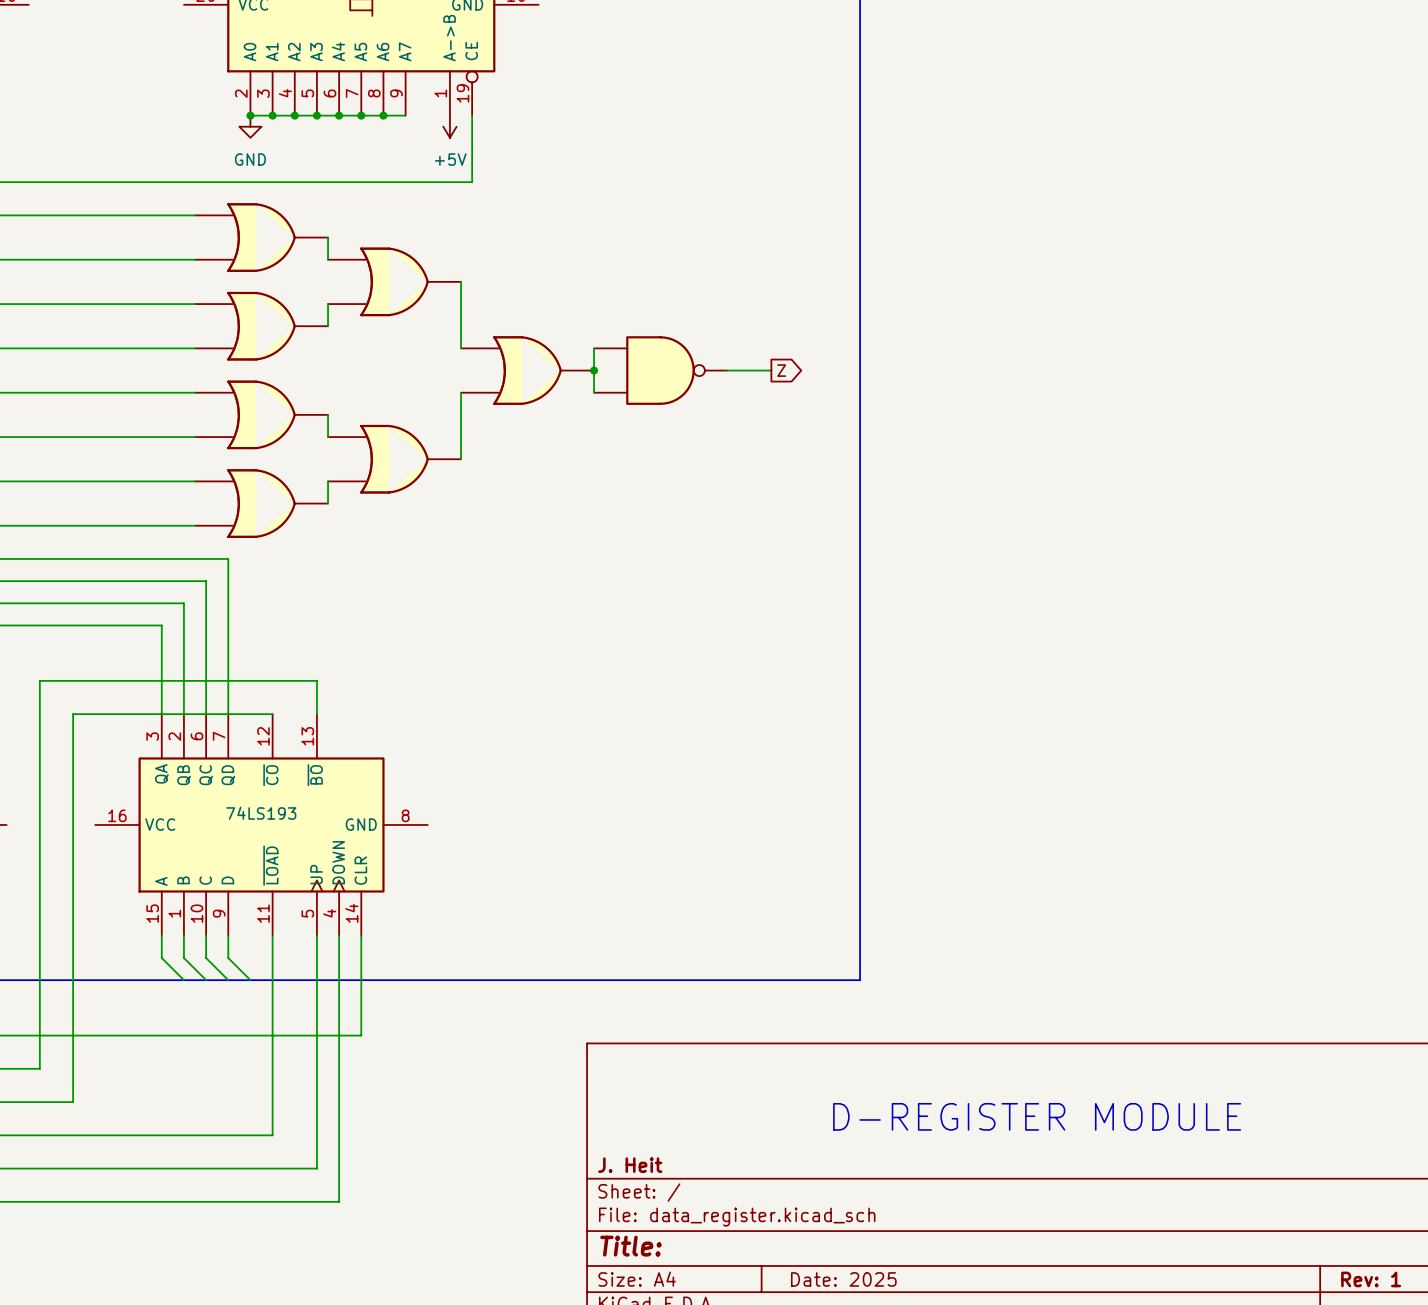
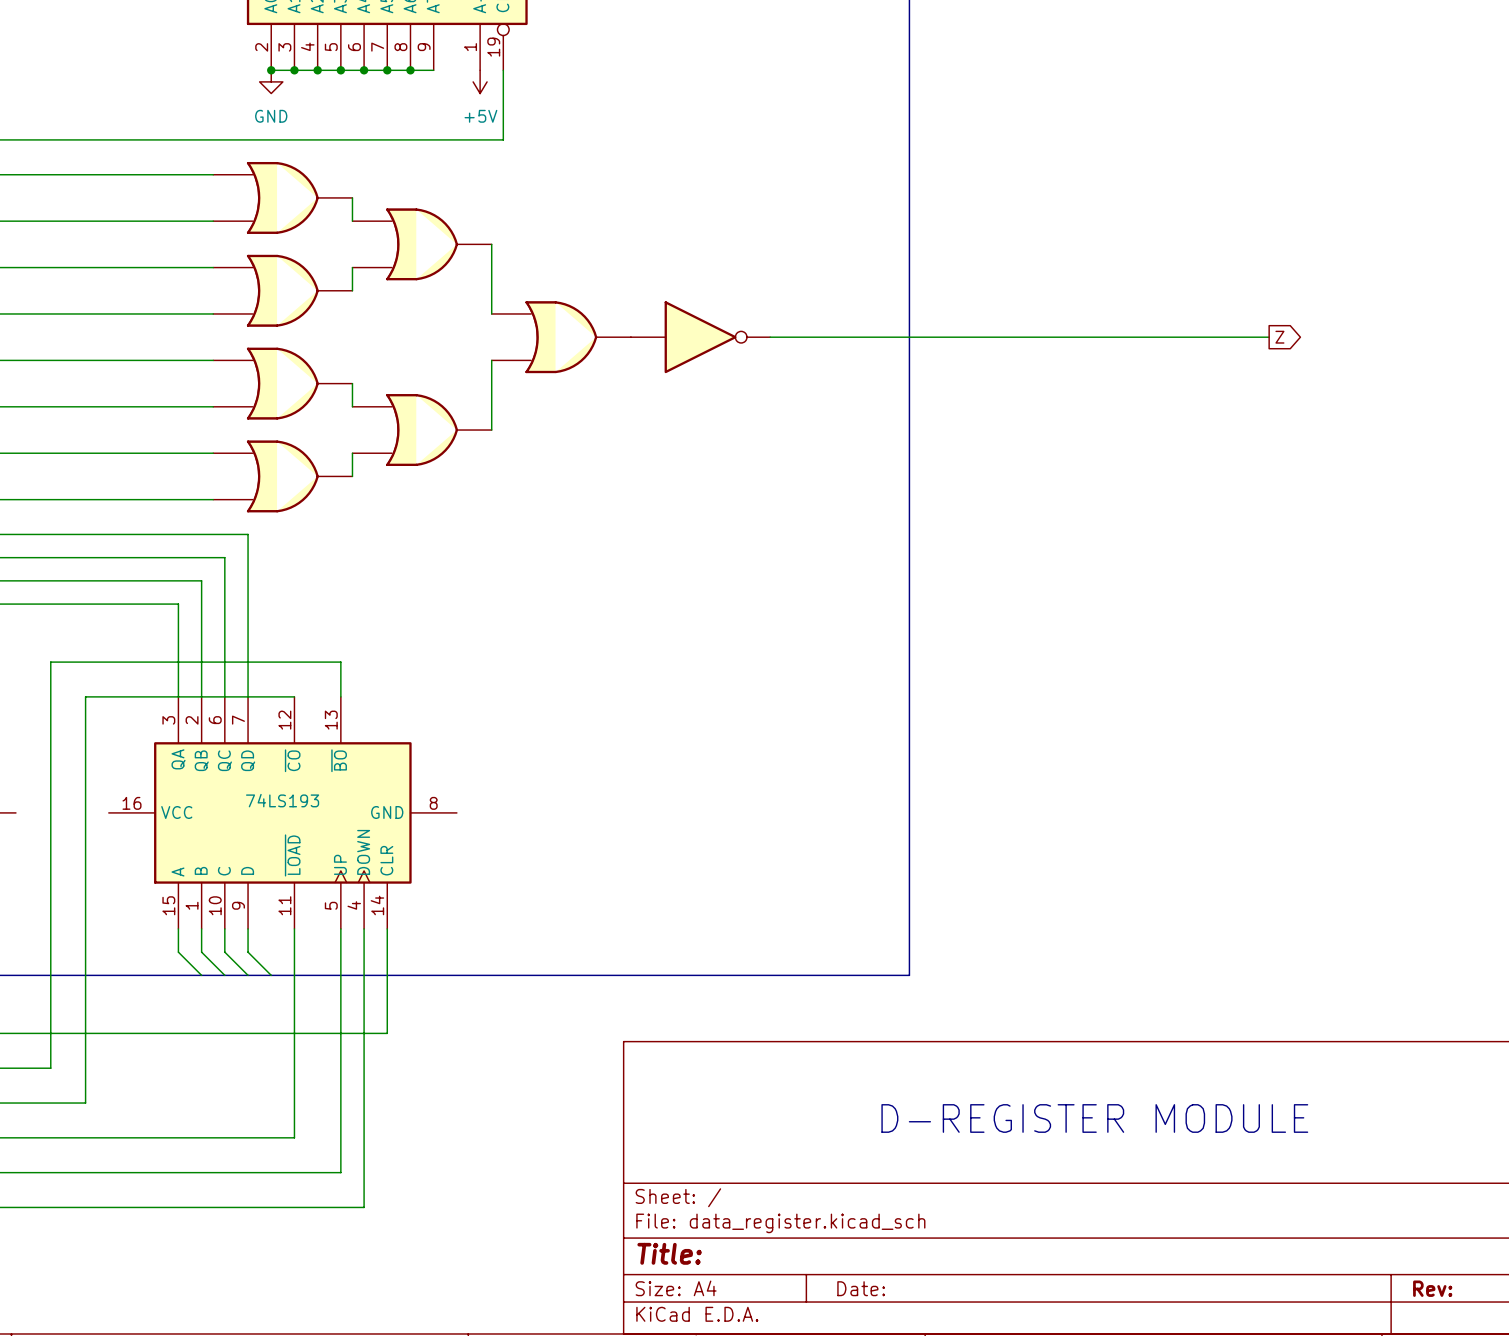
part symbol: [594, 336, 728, 405] -> [630, 301, 771, 374]
wire: (594, 348) (594, 392) -> none
junction: (594, 370) -> none
wire: none -> (816, 337) (1269, 337)
global label: Z (781, 370) -> none
global label: none -> Z (1279, 337)
title block: J. Heit (630, 1165) -> none
title block: Date: 2025 (843, 1279) -> Date: (861, 1288)
title block: Rev: 1 (1371, 1279) -> Rev: (1432, 1288)

